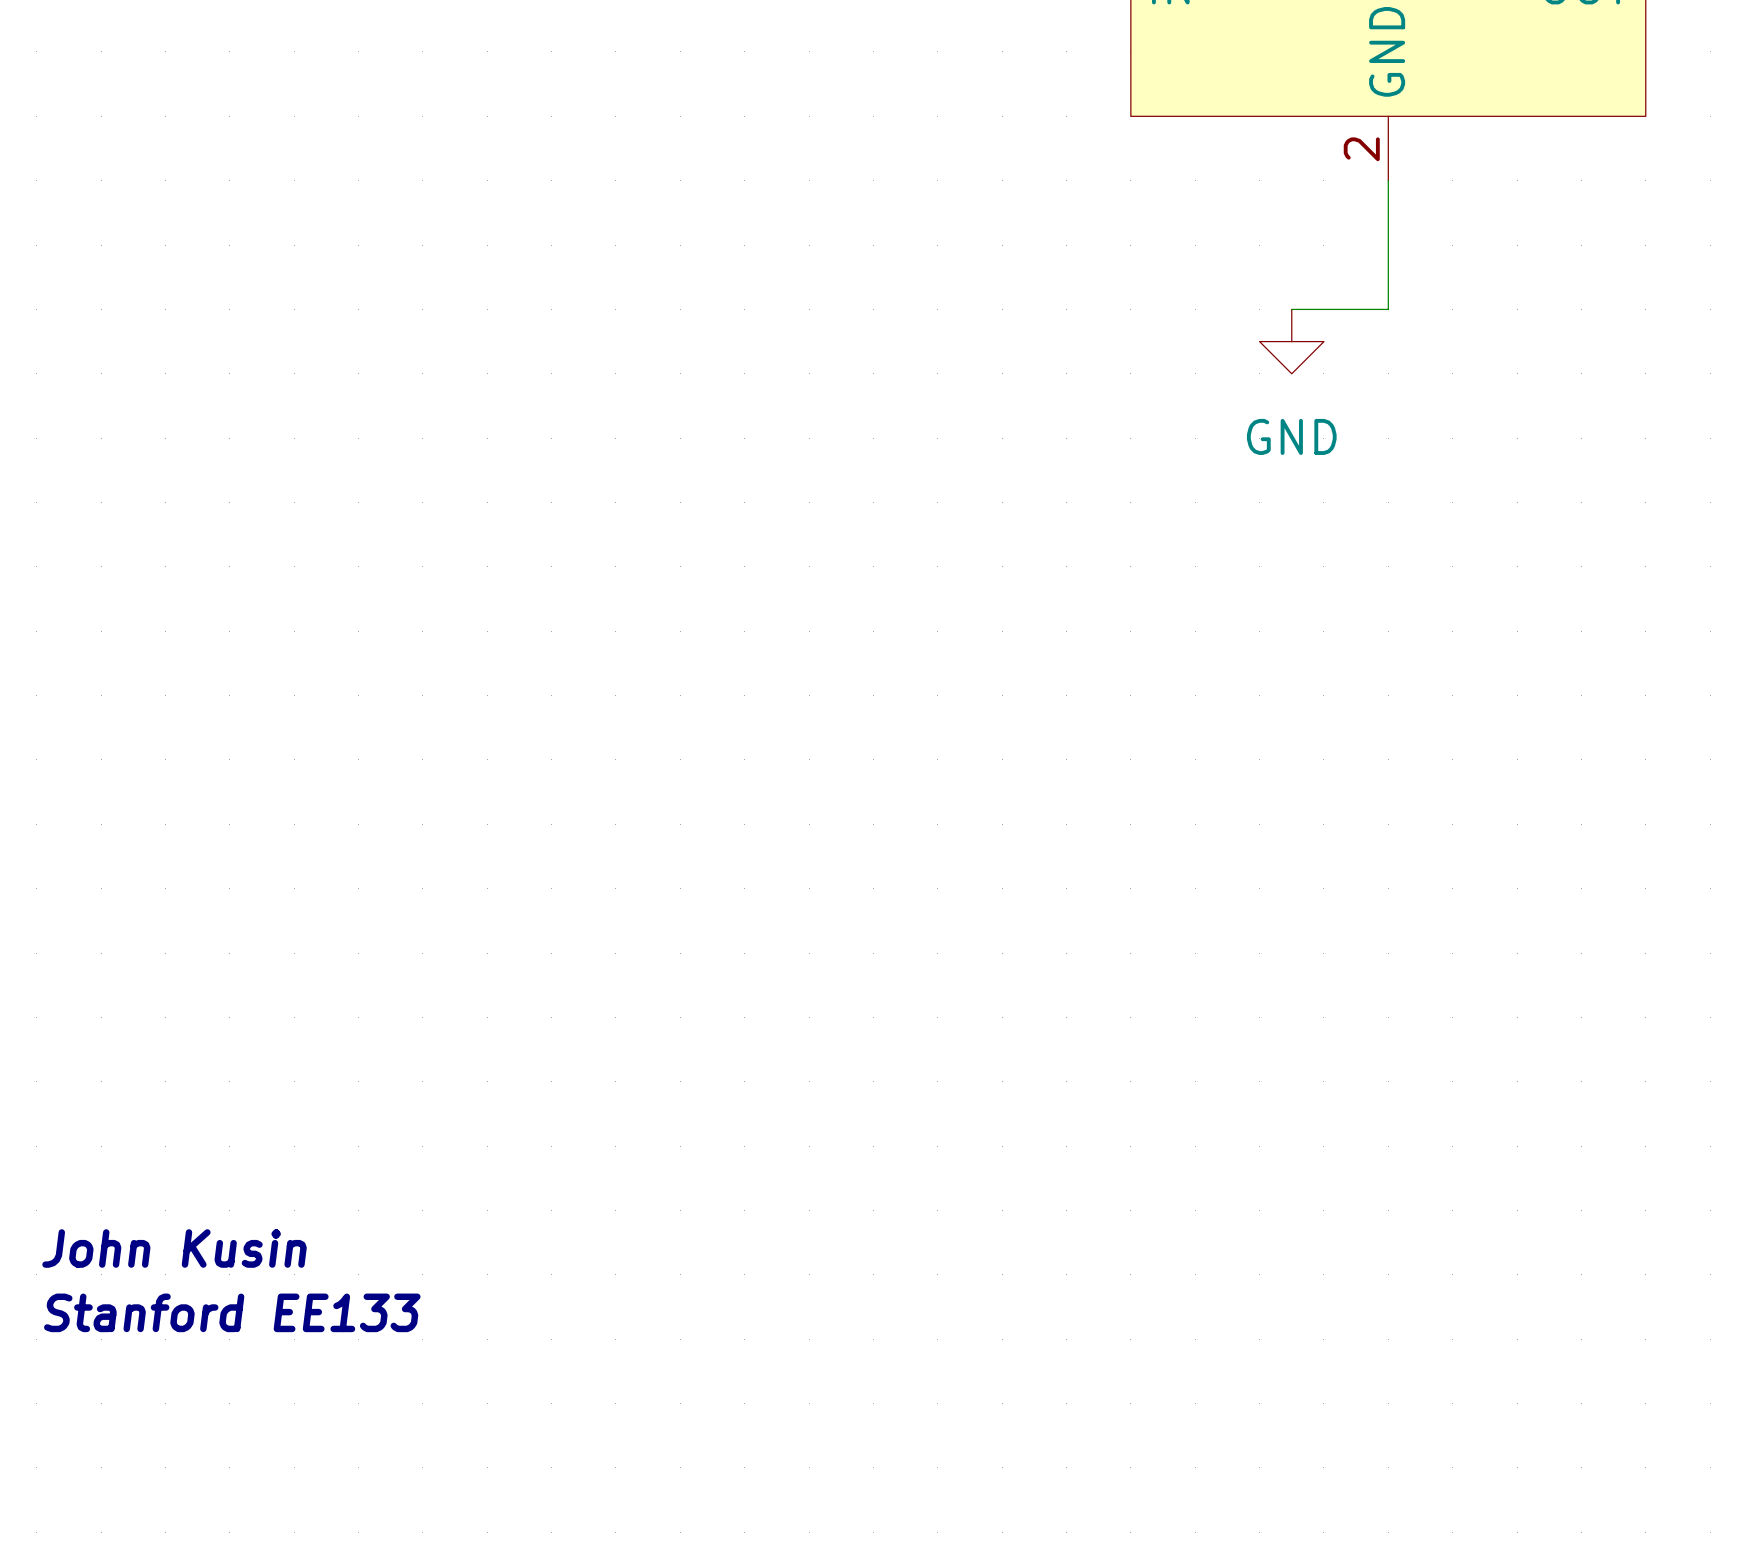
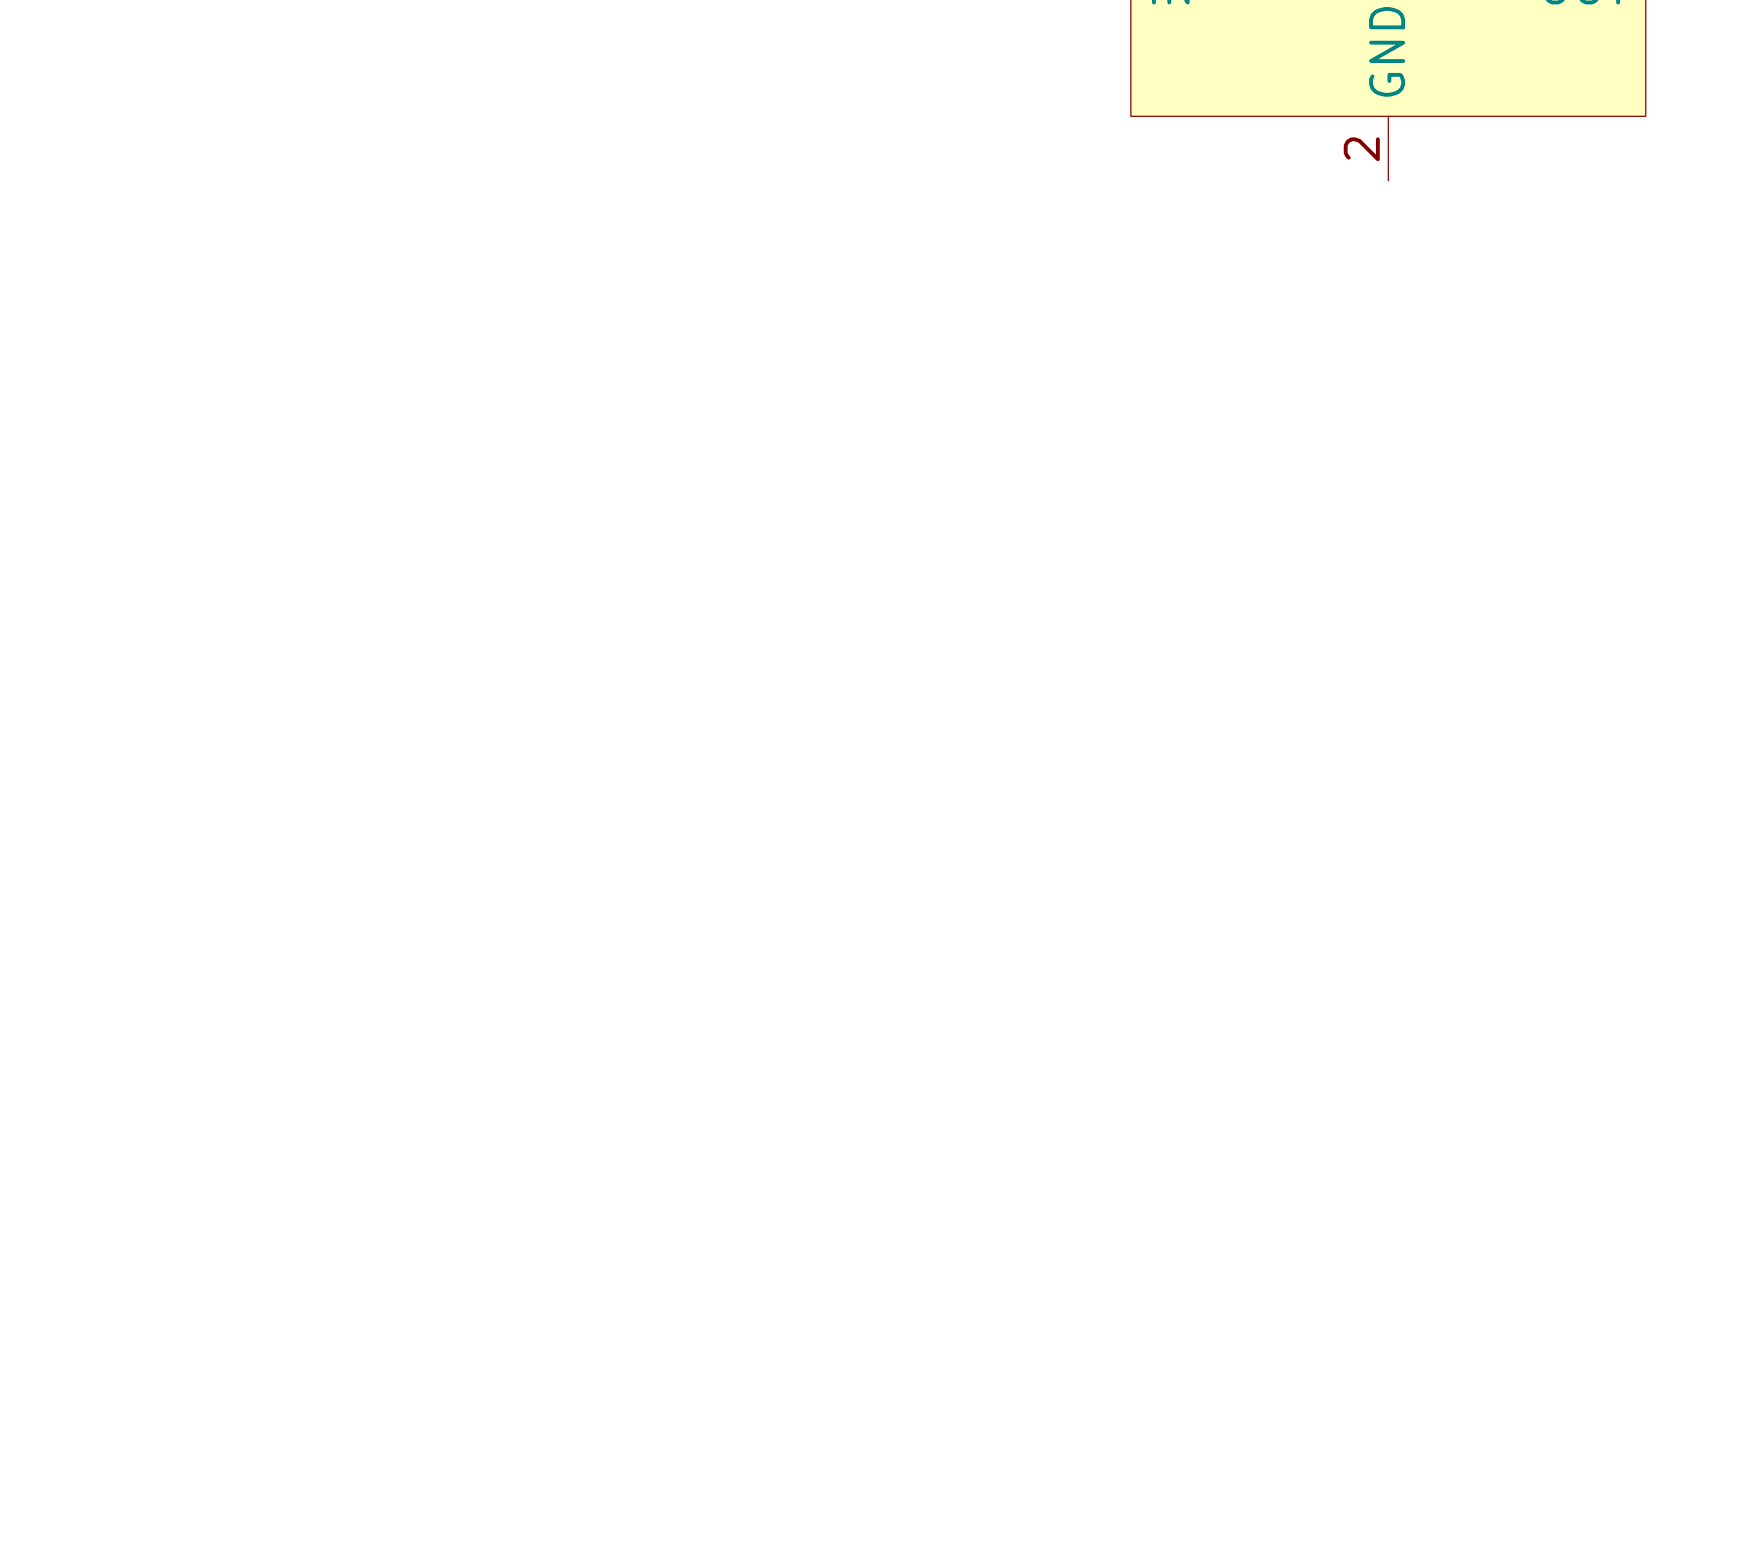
wire: (1388, 180) (1388, 309) (1291, 309) -> none
power symbol: GND (1291, 341) -> none
text: John Kusin (174, 1248) -> none
text: Stanford EE133 (232, 1312) -> none

